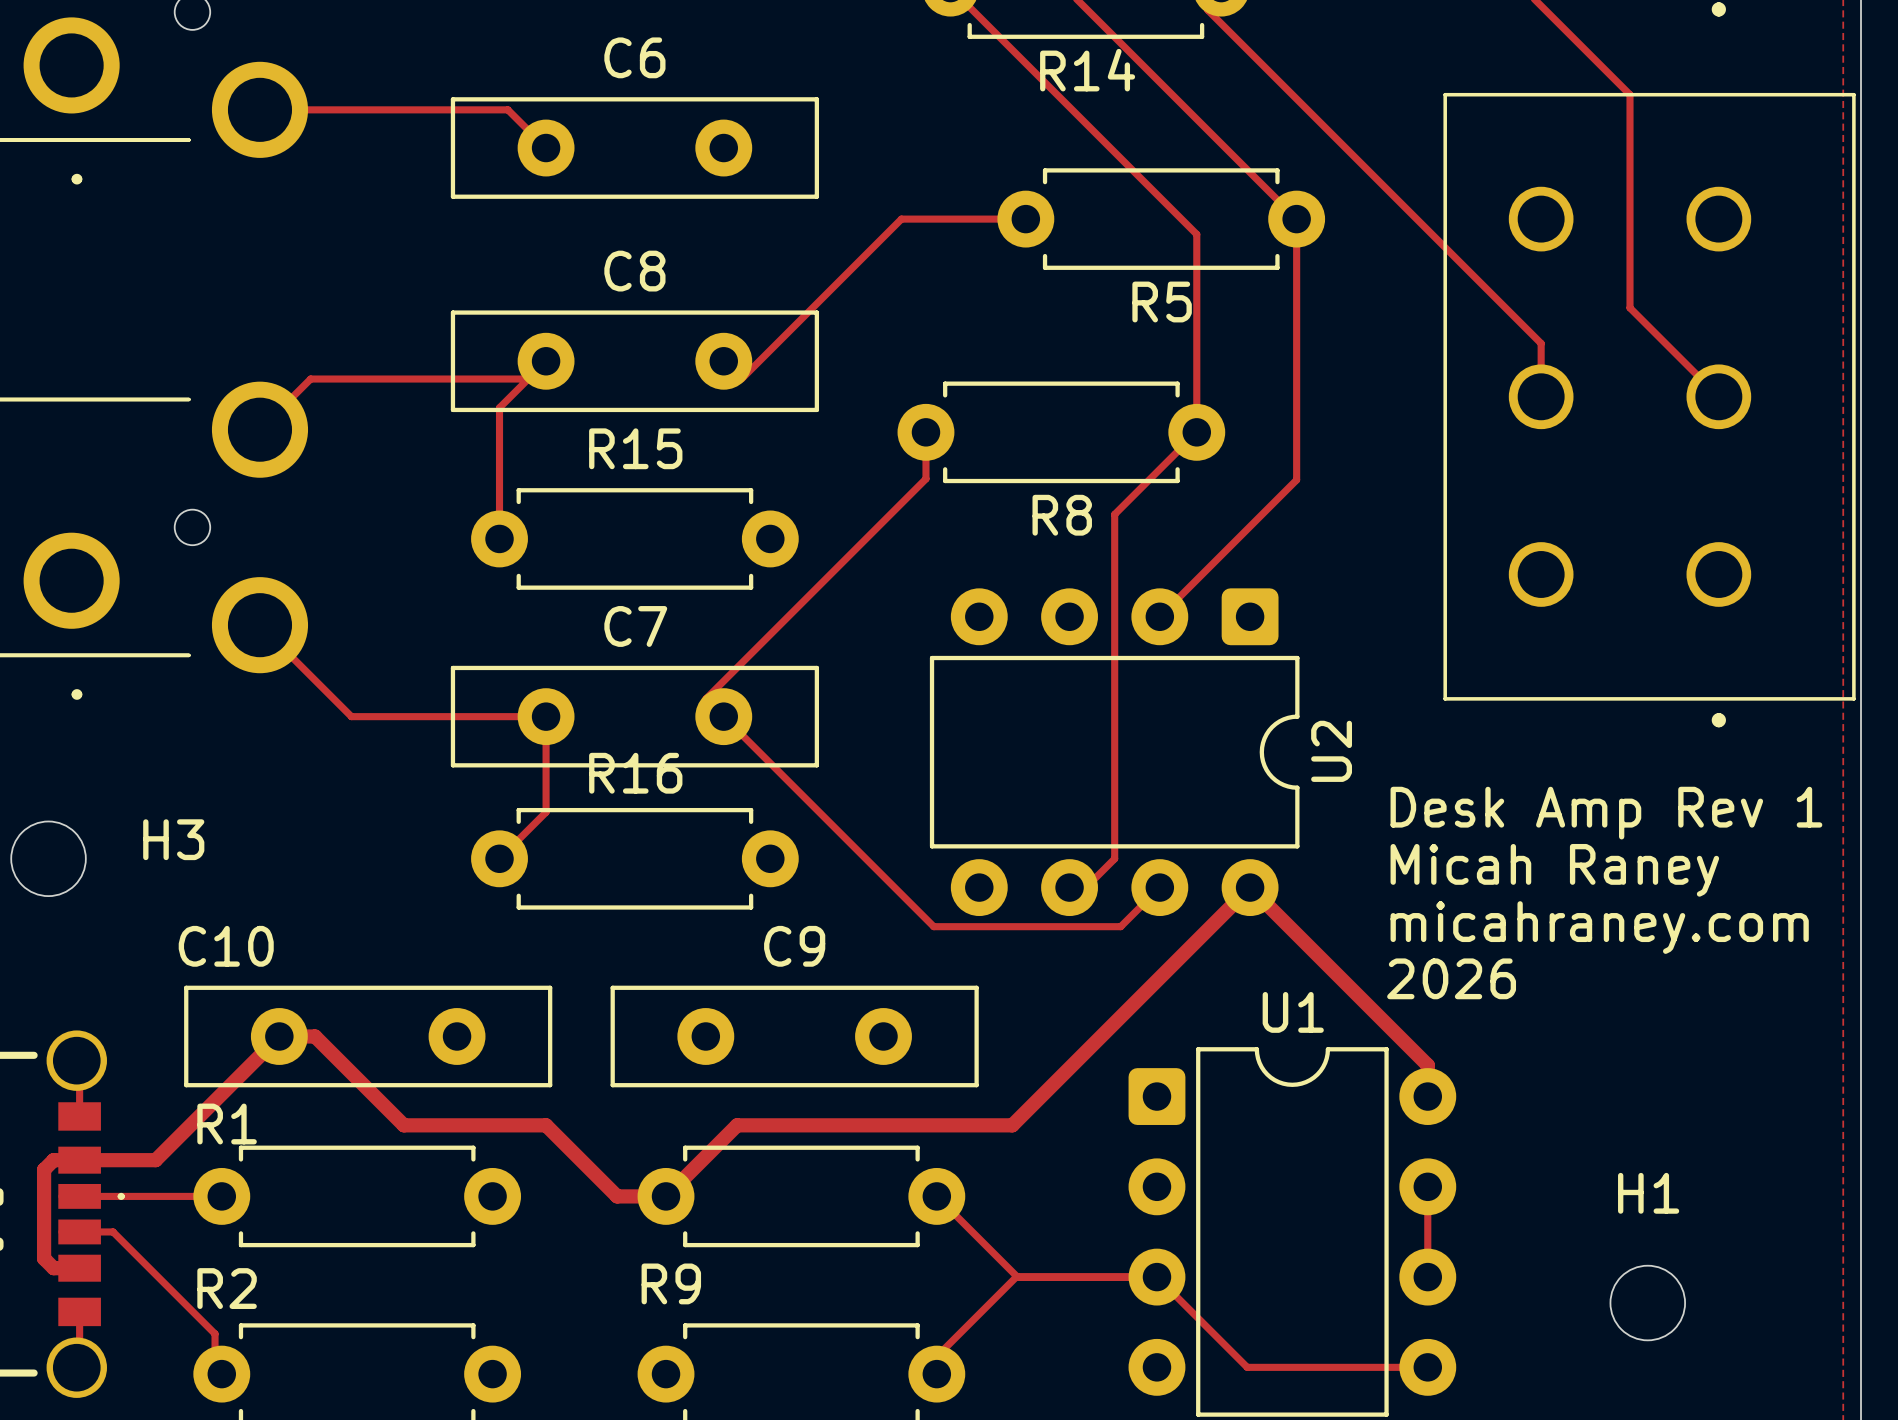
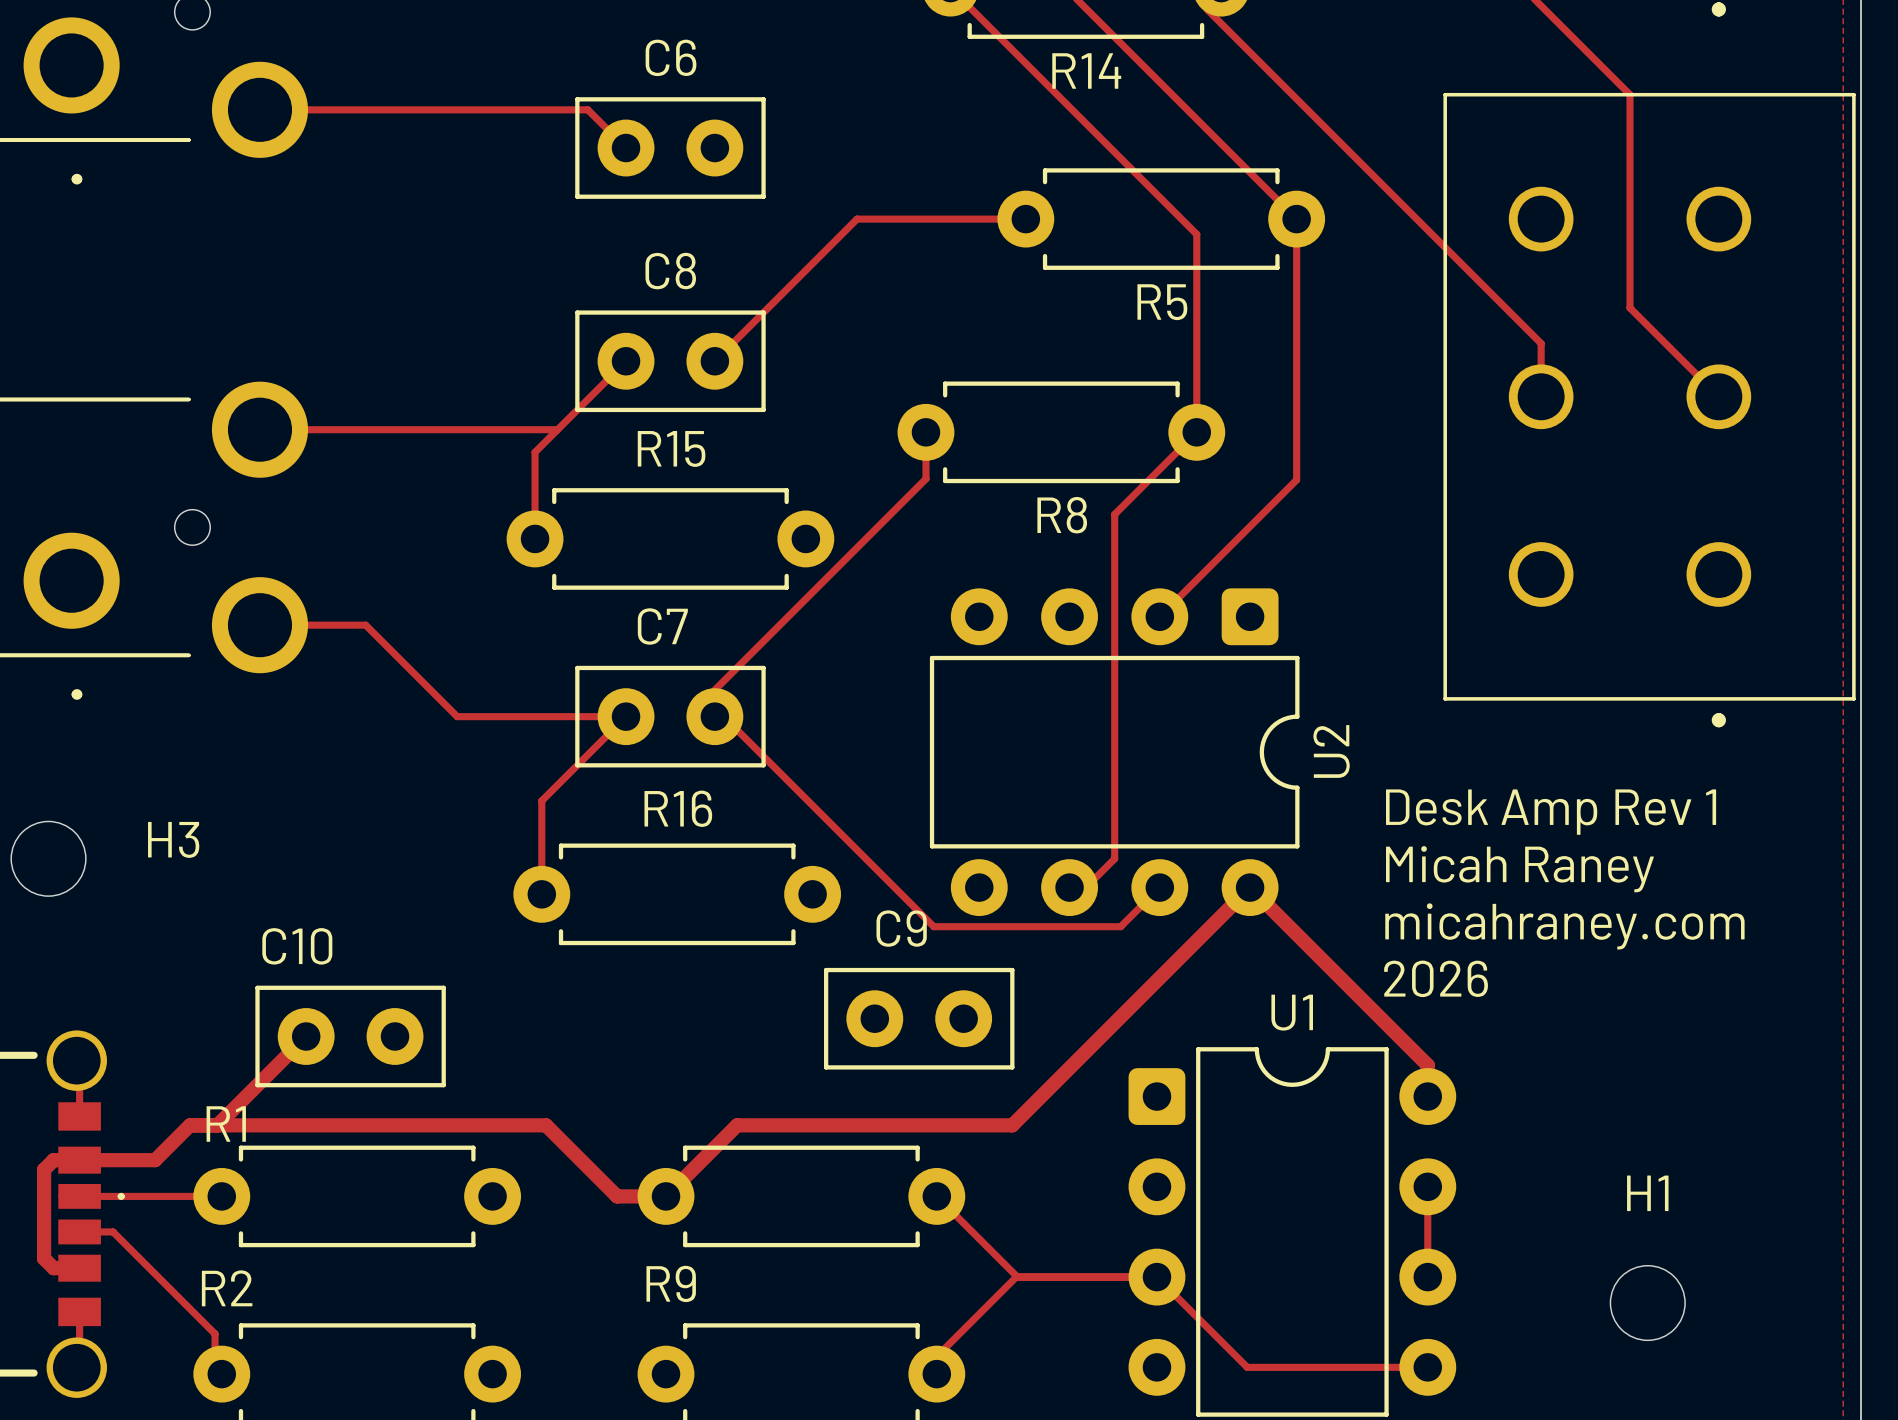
C6 footprint: [450, 97, 820, 199] -> [575, 97, 766, 199]
track: (507, 109) (546, 148) -> (507, 109) (587, 109) (626, 148)
track: (901, 219) (741, 379) -> (901, 219) (857, 219) (714, 361)
C8 footprint: [450, 310, 820, 413] -> [575, 310, 766, 413]
track: (546, 361) (499, 407) (499, 538) -> none
track: none -> (626, 361) (535, 452) (535, 538)
track: (546, 379) (310, 379) (259, 429) -> (557, 429) (259, 429)
R15 position: (634, 538) -> (670, 538)
track: (259, 625) (351, 716) (457, 716) -> (259, 625) (365, 625) (457, 716)
C7 footprint: [450, 665, 820, 768] -> [575, 665, 766, 768]
track: (546, 716) (546, 812) (499, 858) -> (546, 716) (626, 716) (541, 800) (541, 894)
R16 position: (634, 858) -> (677, 894)
C10 name position: C10 (226, 946) -> C10 (297, 946)
C10 footprint: [184, 985, 553, 1088] -> [255, 985, 446, 1088]
C9 footprint: [610, 985, 979, 1088] -> [823, 967, 1015, 1070]
track: none -> (306, 1036) (217, 1125)
track: (403, 1125) (315, 1036) (279, 1036) (155, 1160) -> (403, 1125) (189, 1125) (155, 1160)

